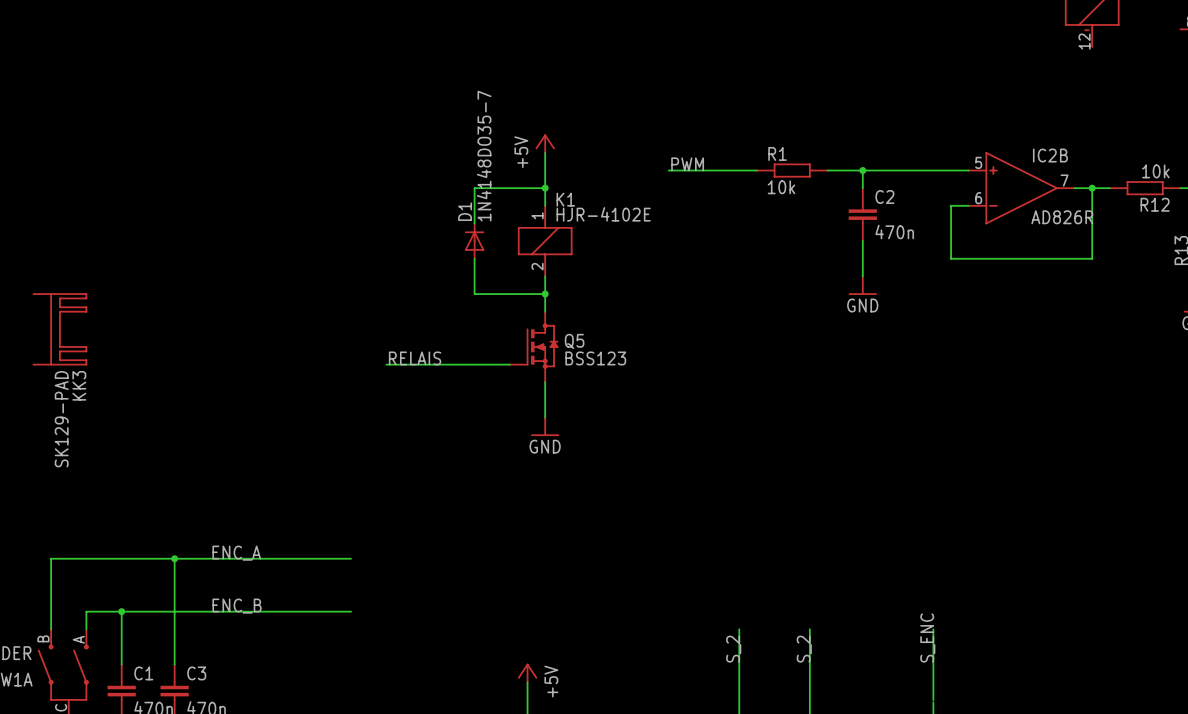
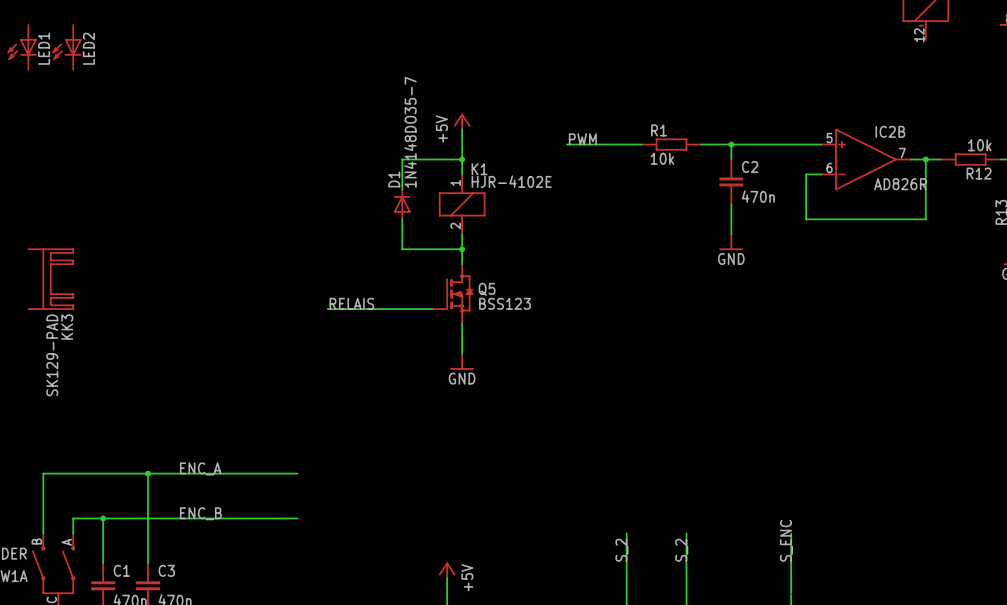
LED1: none -> (22, 47)
LED2: none -> (67, 47)

